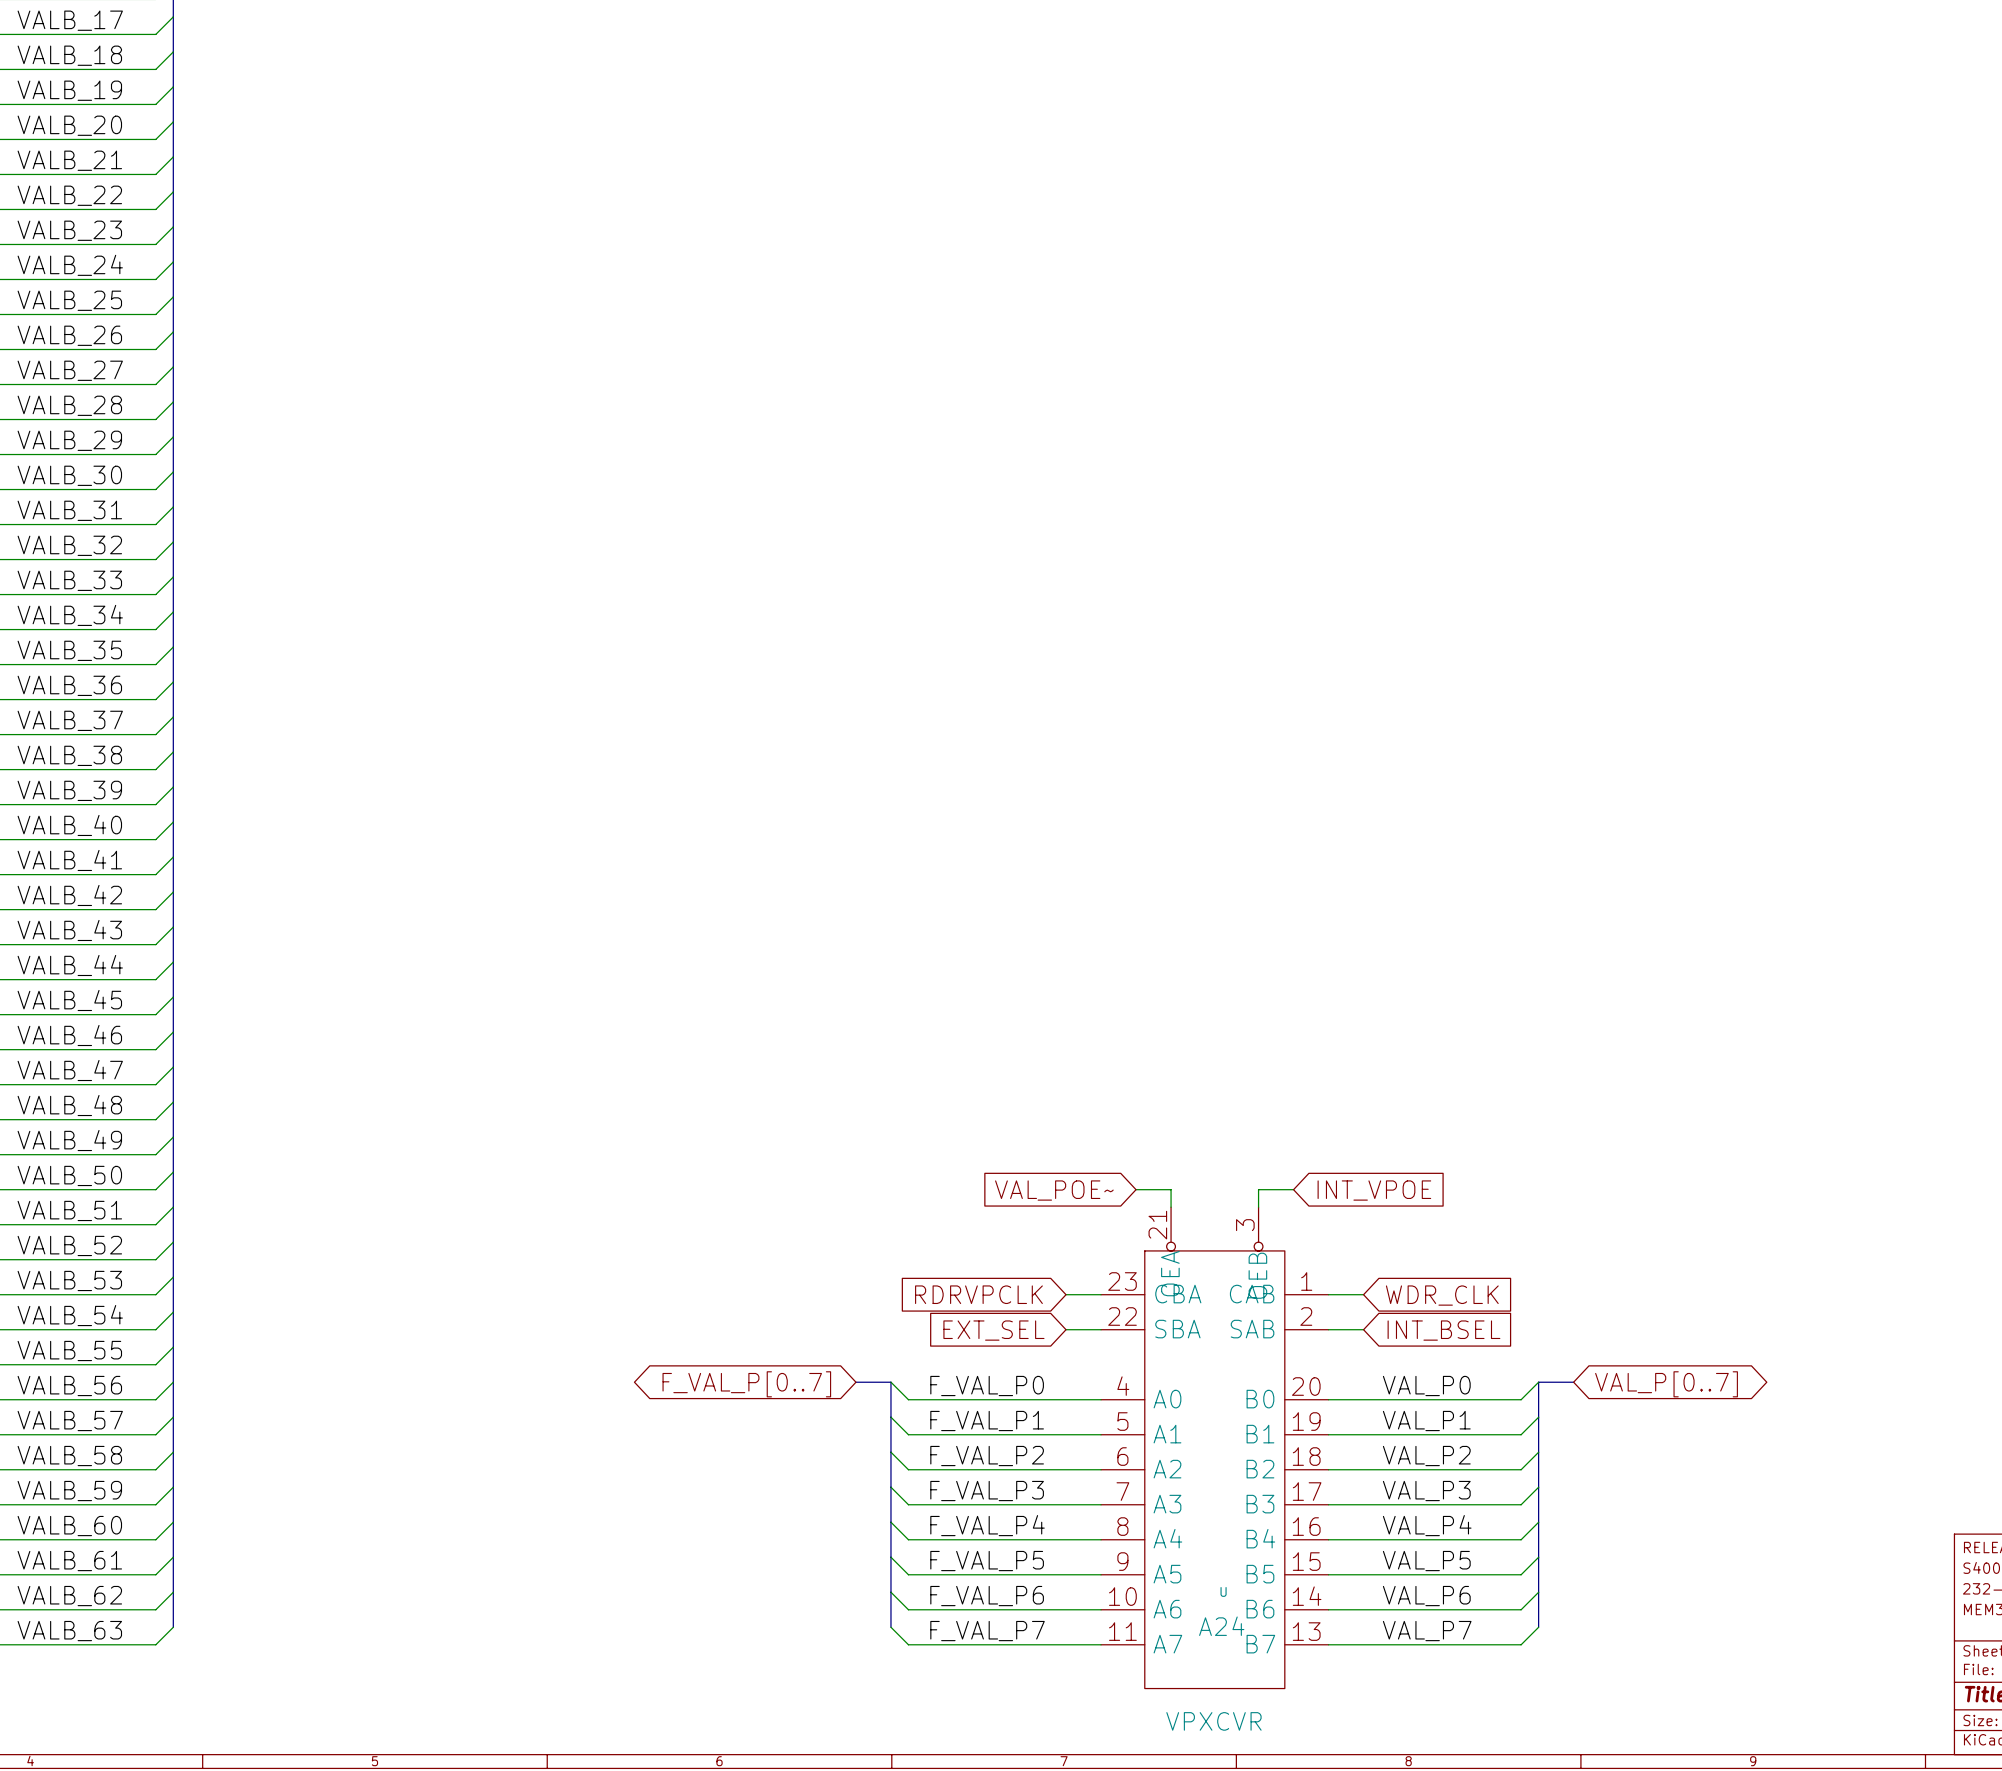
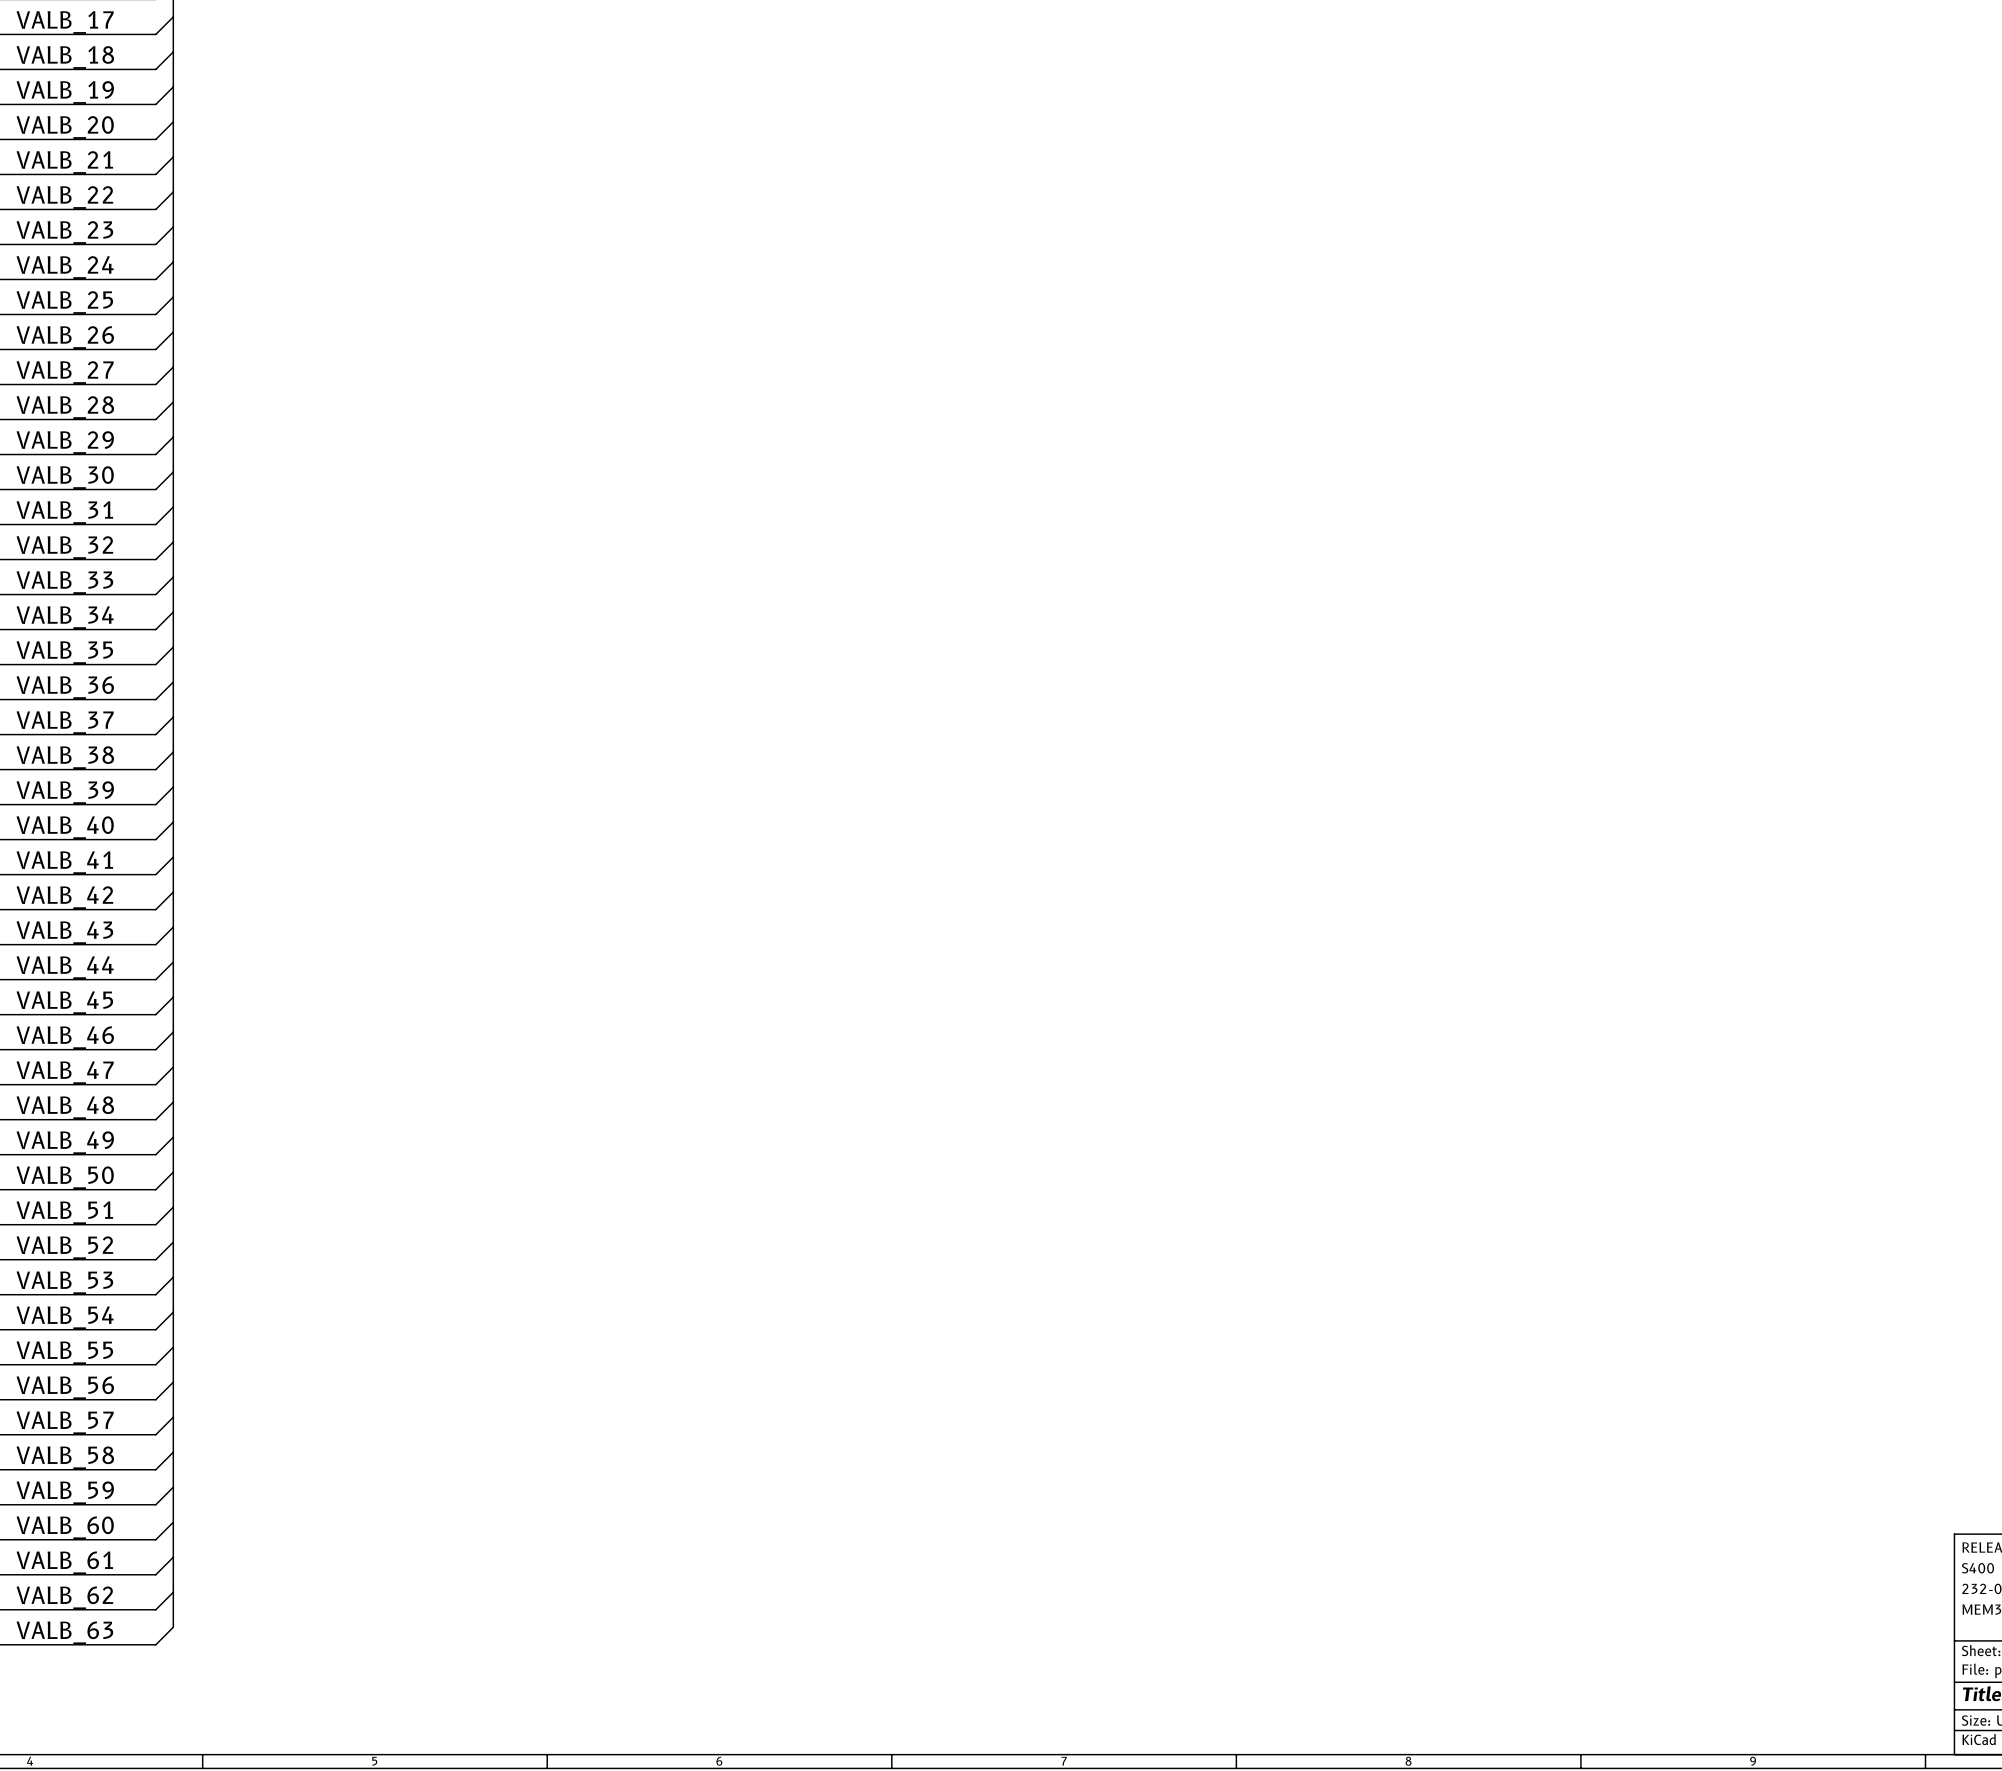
wire: (1136, 1189) (1171, 1189) (1171, 1207) -> none
wire: (1293, 1189) (1258, 1189) (1258, 1207) -> none
global label: VAL_POE~ (1054, 1190) -> none
global label: INT_VPOE (1374, 1190) -> none
global label: RDRVPCLK (978, 1294) -> none
wire: (1066, 1294) (1101, 1294) -> none
wire: (1328, 1294) (1363, 1294) -> none
global label: WDR_CLK (1442, 1295) -> none
wire: (1066, 1329) (1101, 1329) -> none
wire: (1328, 1329) (1363, 1329) -> none
global label: EXT_SEL (993, 1330) -> none
global label: INT_BSEL (1443, 1330) -> none
bus: (855, 1382) (890, 1382) (890, 1627) -> none
wire: (890, 1382) (908, 1399) (1101, 1399) -> none
wire: (1538, 1382) (1521, 1399) (1328, 1399) -> none
bus: (1573, 1382) (1538, 1382) (1538, 1627) -> none
global label: F_VAL_P[0..7] (746, 1384) -> none
global label: VAL_P[0..7] (1666, 1384) -> none
label: F_VAL_P0 (987, 1385) -> none
label: VAL_P0 (1426, 1385) -> none
wire: (890, 1417) (908, 1434) (1101, 1434) -> none
wire: (1538, 1417) (1521, 1434) (1328, 1434) -> none
label: F_VAL_P1 (987, 1421) -> none
label: VAL_P1 (1426, 1421) -> none
U: (1214, 1447) -> none
wire: (890, 1452) (908, 1469) (1101, 1469) -> none
wire: (1538, 1452) (1521, 1469) (1328, 1469) -> none
label: F_VAL_P2 (987, 1456) -> none
label: VAL_P2 (1426, 1456) -> none
wire: (890, 1487) (908, 1504) (1101, 1504) -> none
wire: (1538, 1487) (1521, 1504) (1328, 1504) -> none
label: F_VAL_P3 (987, 1491) -> none
label: VAL_P3 (1426, 1491) -> none
wire: (890, 1522) (908, 1539) (1101, 1539) -> none
wire: (1538, 1522) (1521, 1539) (1328, 1539) -> none
label: F_VAL_P4 (987, 1525) -> none
label: VAL_P4 (1427, 1525) -> none
wire: (890, 1557) (908, 1574) (1101, 1574) -> none
wire: (1538, 1557) (1521, 1574) (1328, 1574) -> none
label: F_VAL_P5 (987, 1561) -> none
label: VAL_P5 (1426, 1561) -> none
wire: (890, 1592) (908, 1609) (1101, 1609) -> none
wire: (1538, 1592) (1521, 1609) (1328, 1609) -> none
label: F_VAL_P6 (987, 1596) -> none
label: VAL_P6 (1426, 1596) -> none
wire: (890, 1627) (908, 1644) (1101, 1644) -> none
wire: (1538, 1627) (1521, 1644) (1328, 1644) -> none
label: F_VAL_P7 (987, 1631) -> none
label: VAL_P7 (1427, 1631) -> none

